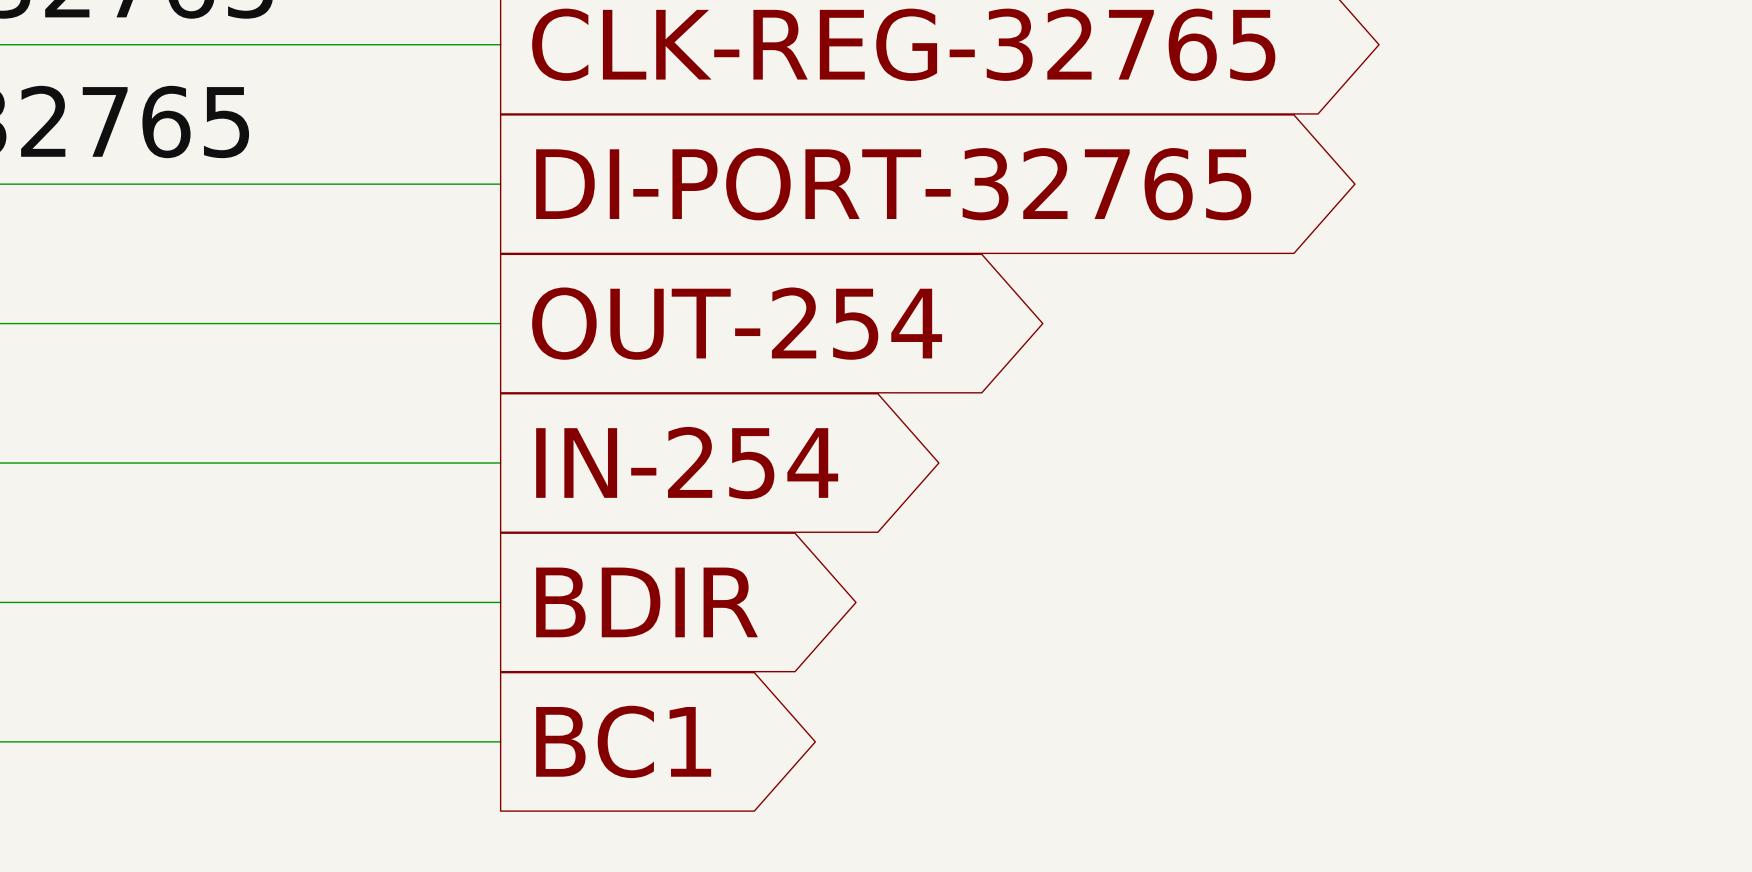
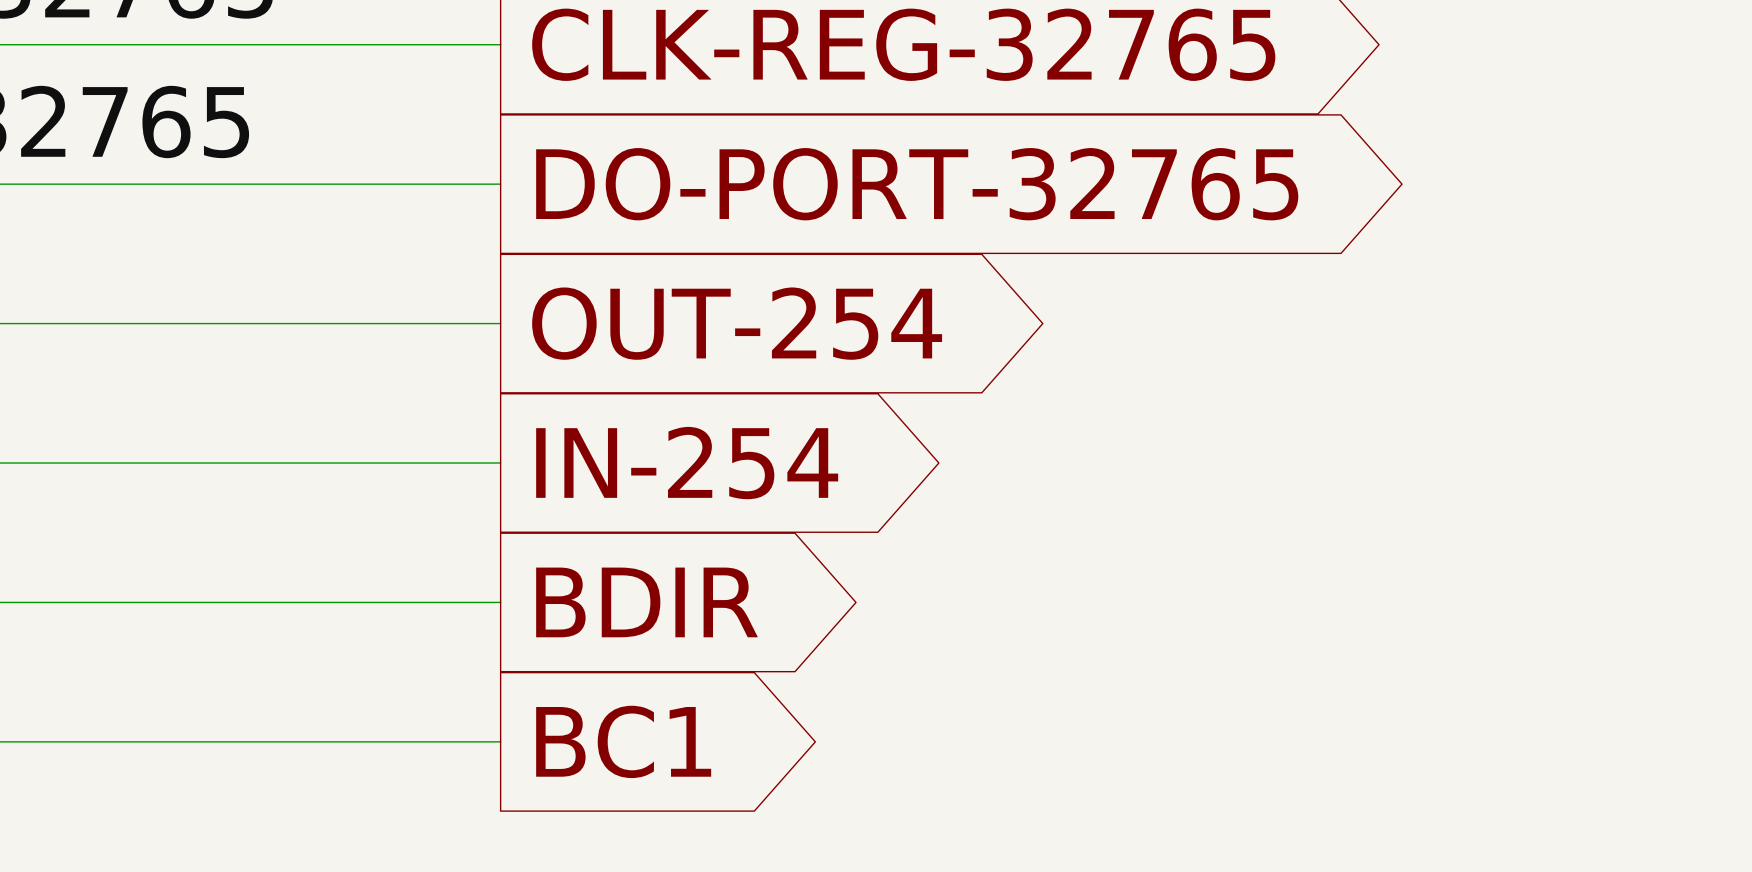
global label: DI-PORT-32765 (893, 184) -> DO-PORT-32765 (917, 184)

